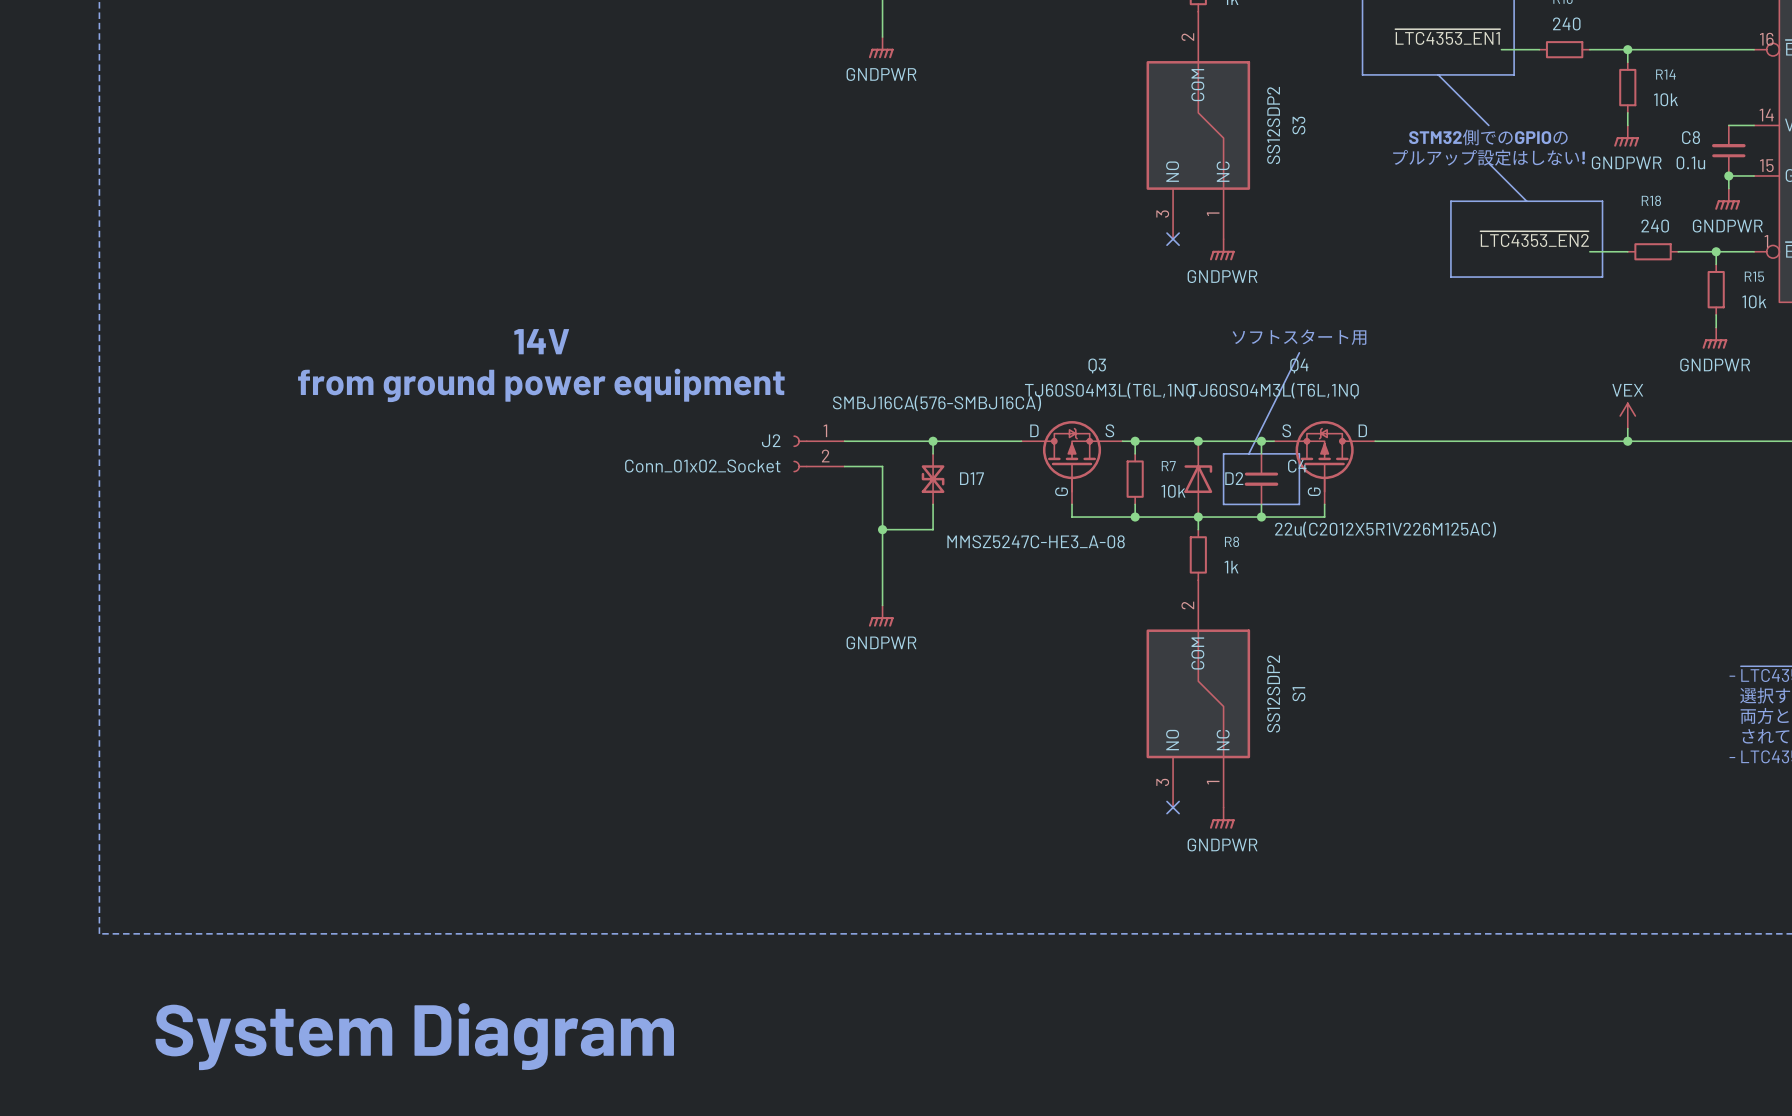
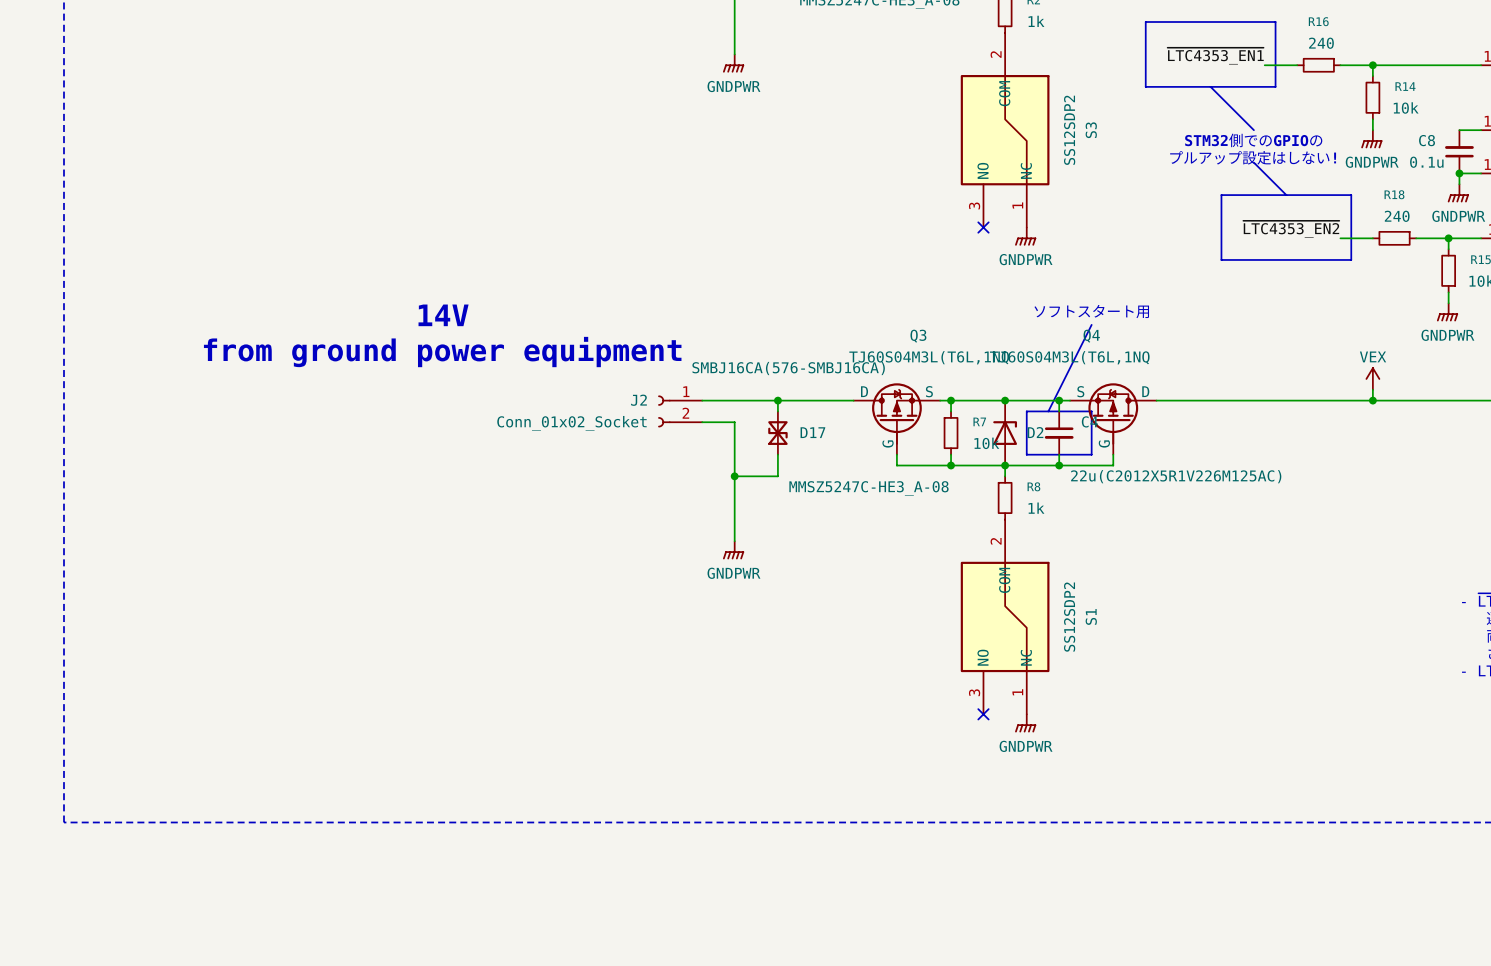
text: System Diagram (414, 1036) -> none

